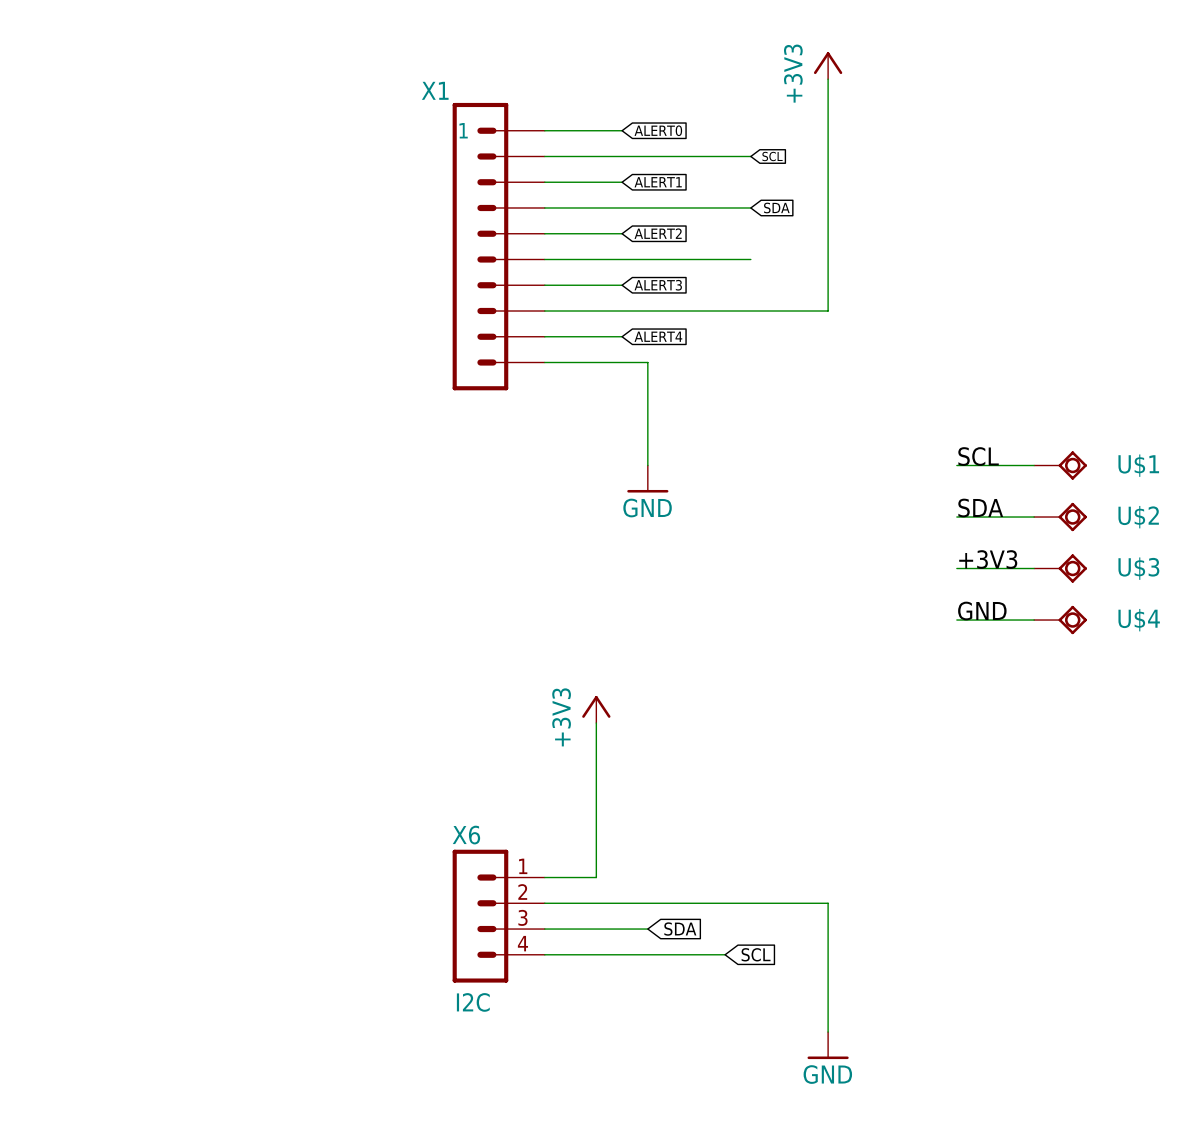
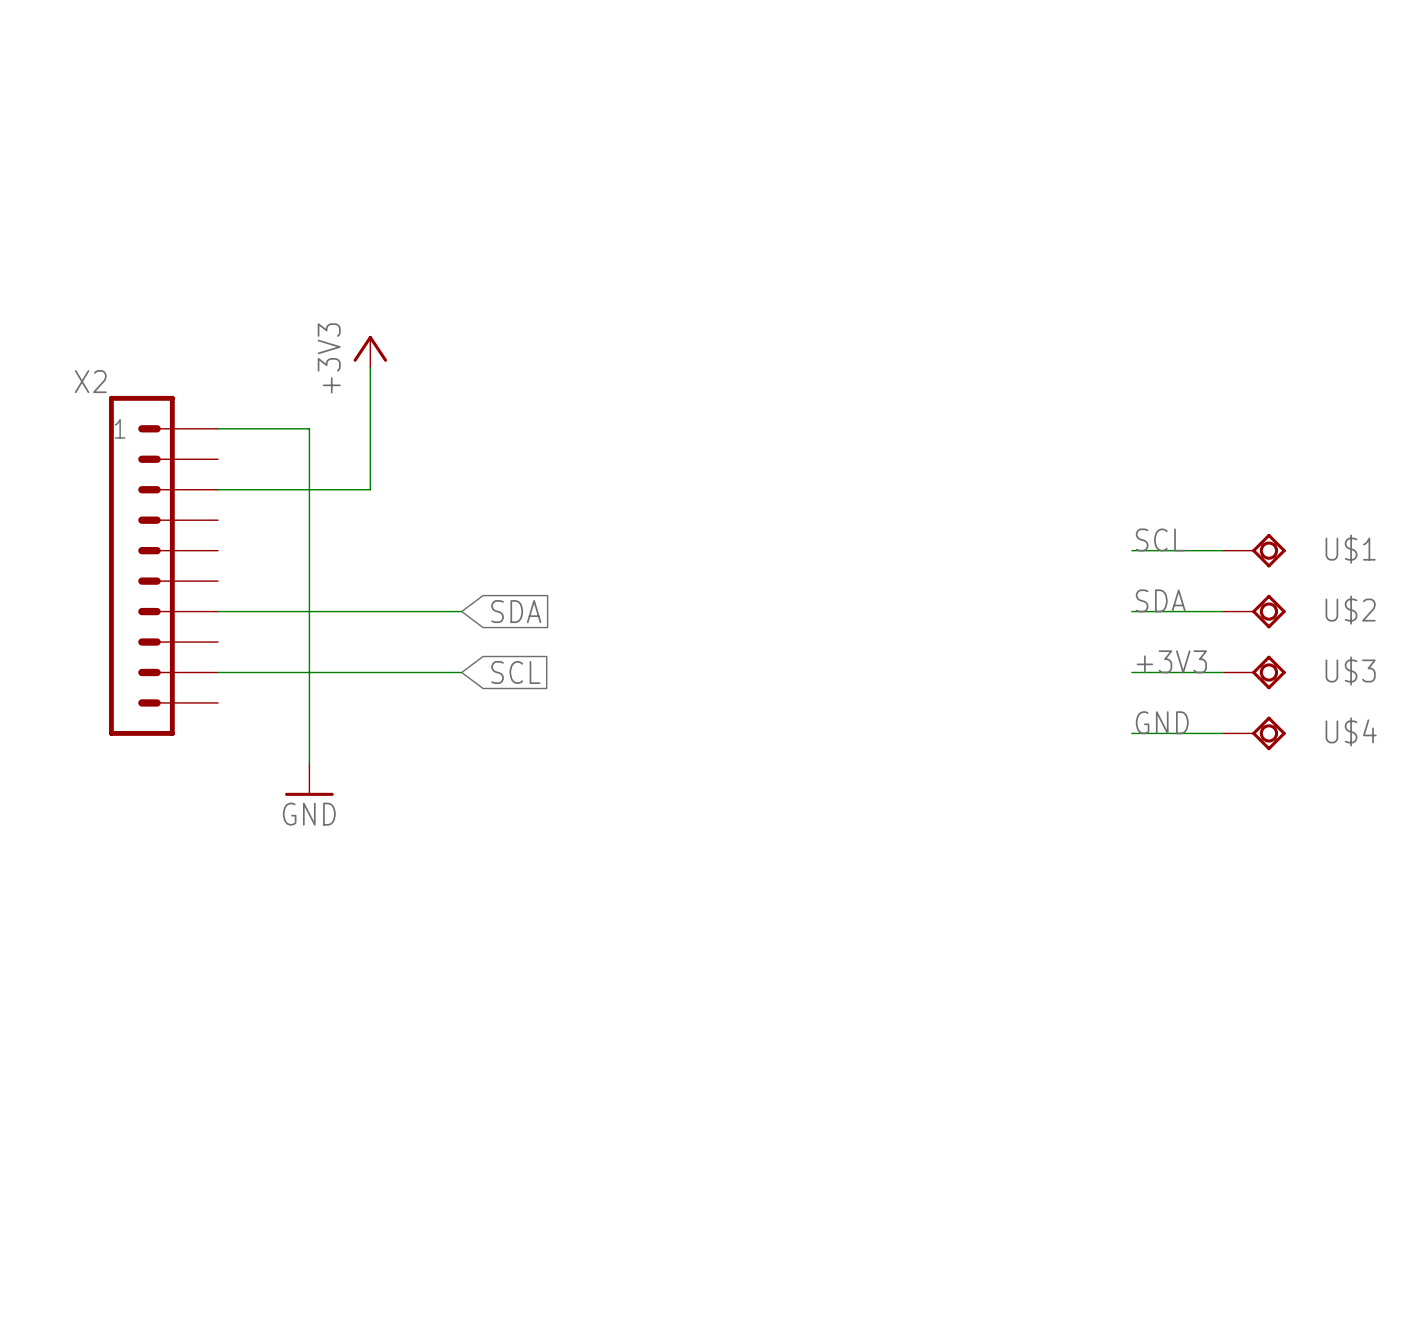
power symbol: +3V3 (828, 65) -> none
wire: (828, 79) (828, 311) (544, 311) -> none
wire: (544, 130) (622, 130) -> none
global label: ALERT0 (658, 130) -> none
wire: (544, 156) (750, 156) -> none
global label: SCL (772, 156) -> none
wire: (544, 182) (622, 182) -> none
global label: ALERT1 (658, 182) -> none
wire: (544, 207) (750, 207) -> none
global label: SDA (776, 208) -> none
wire: (544, 233) (622, 233) -> none
global label: ALERT2 (658, 233) -> none
X1: (498, 246) -> none
wire: (544, 259) (750, 259) -> none
wire: (544, 285) (622, 285) -> none
global label: ALERT3 (658, 285) -> none
power symbol: none -> +3V3 (370, 351)
wire: none -> (370, 367) (370, 489) (218, 489)
wire: (544, 336) (622, 336) -> none
global label: ALERT4 (658, 336) -> none
wire: none -> (218, 428) (309, 428) (309, 763)
wire: (544, 362) (647, 362) (647, 465) -> none
X2: none -> (163, 565)
power symbol: GND (647, 479) -> none
wire: none -> (218, 611) (461, 611)
global label: none -> SDA (516, 611)
wire: none -> (218, 672) (461, 672)
global label: none -> SCL (515, 672)
power symbol: none -> GND (309, 779)
power symbol: +3V3 (596, 709) -> none
wire: (596, 723) (596, 877) (544, 877) -> none
wire: (544, 903) (828, 903) (828, 1032) -> none
X6: I2C (498, 916) -> none
wire: (544, 929) (647, 929) -> none
global label: SDA (680, 929) -> none
wire: (544, 954) (725, 954) -> none
global label: SCL (756, 954) -> none
power symbol: GND (828, 1045) -> none

